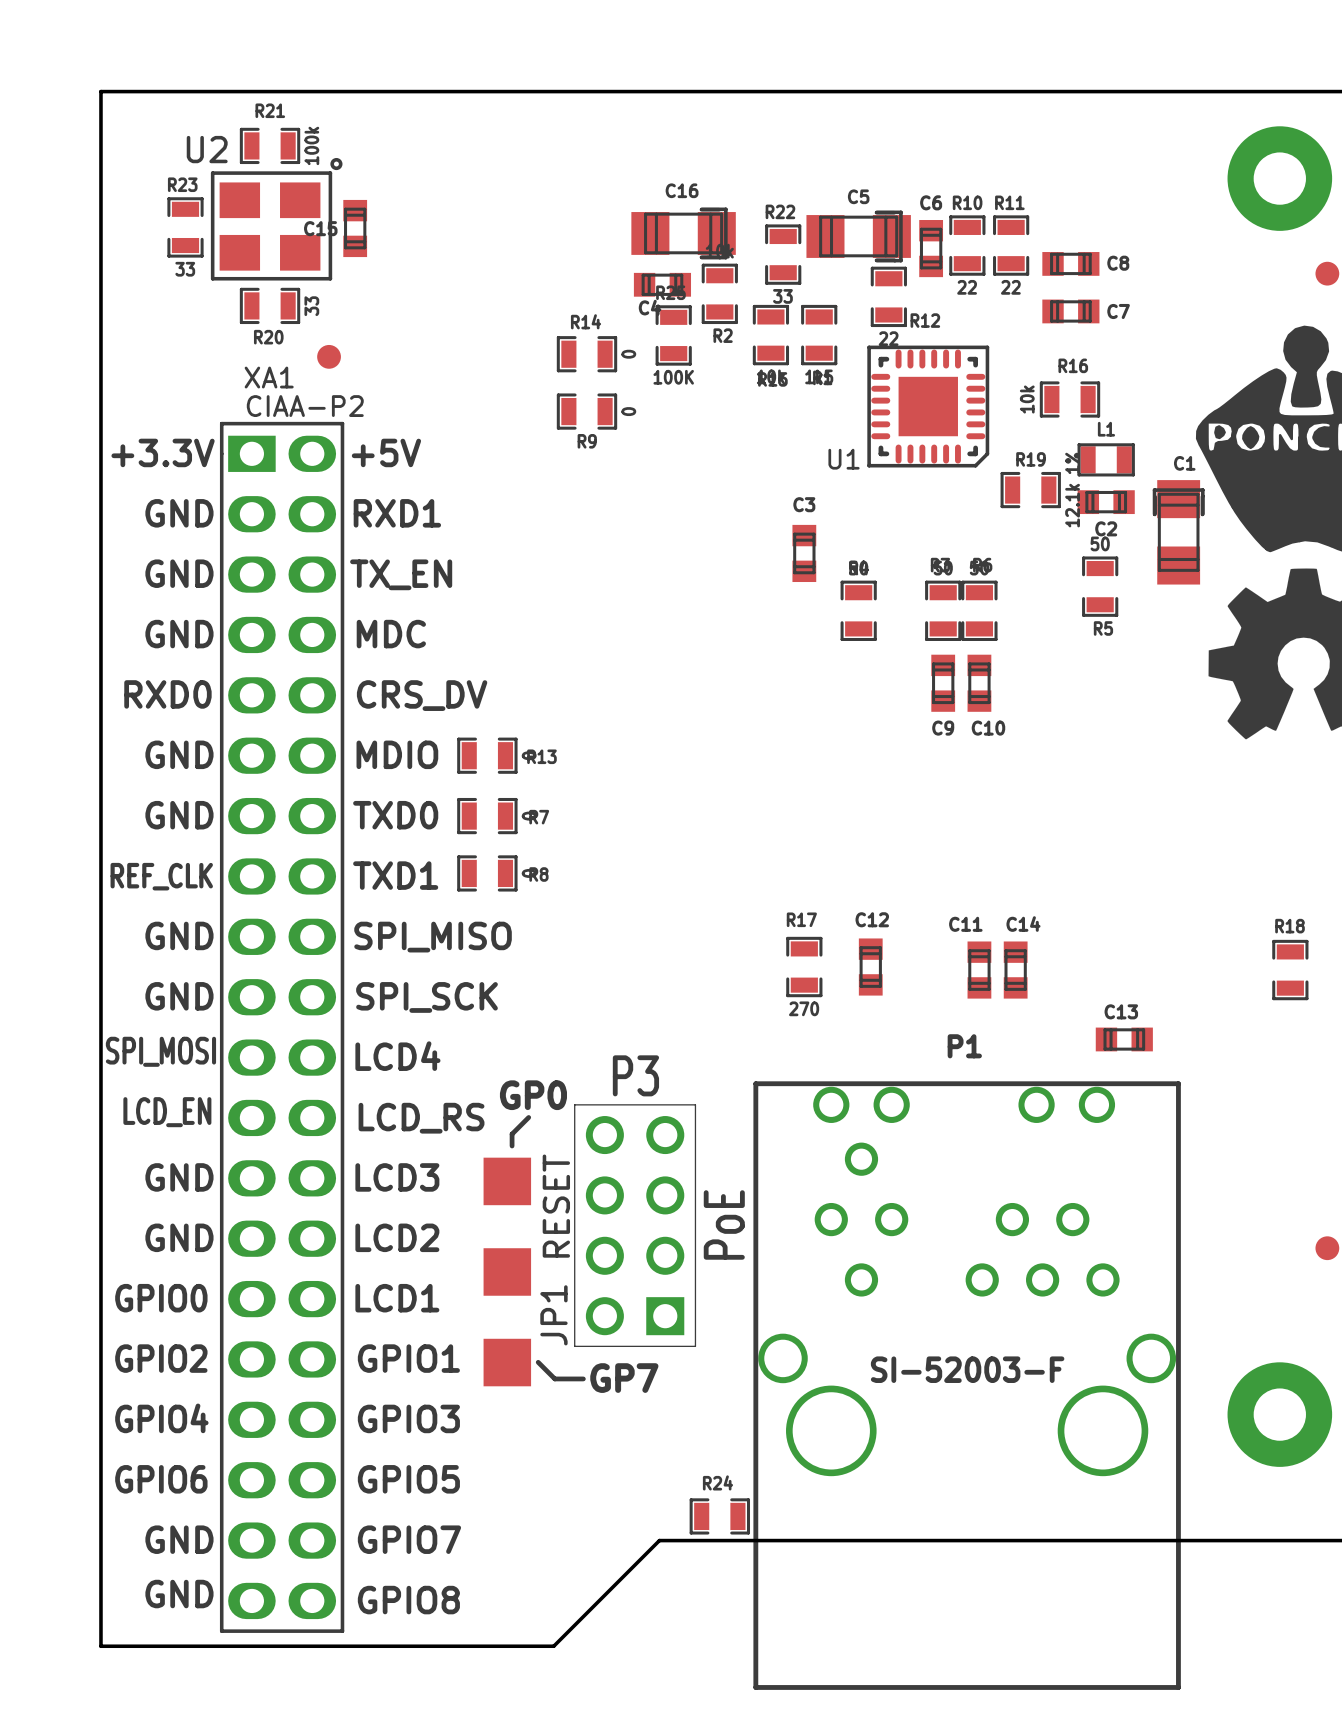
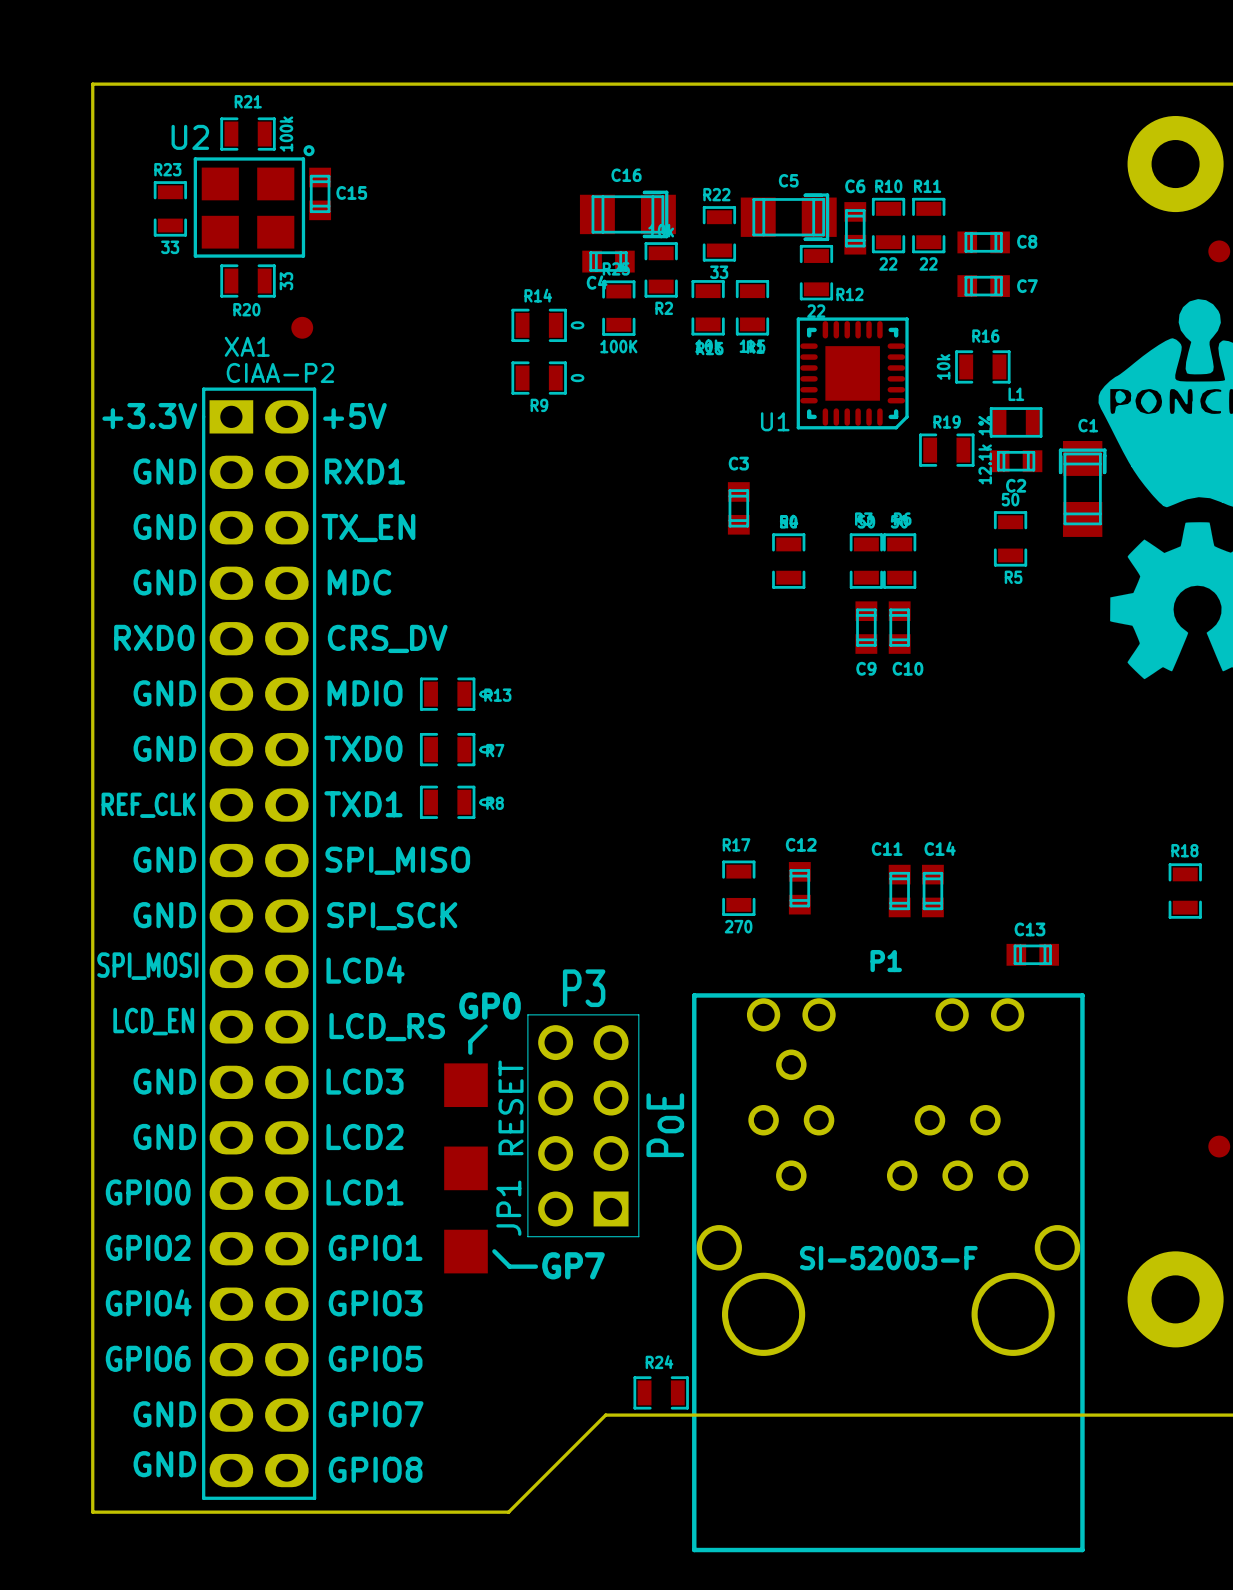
C15 rotation: 0° (355, 228) -> 180° (320, 193)

